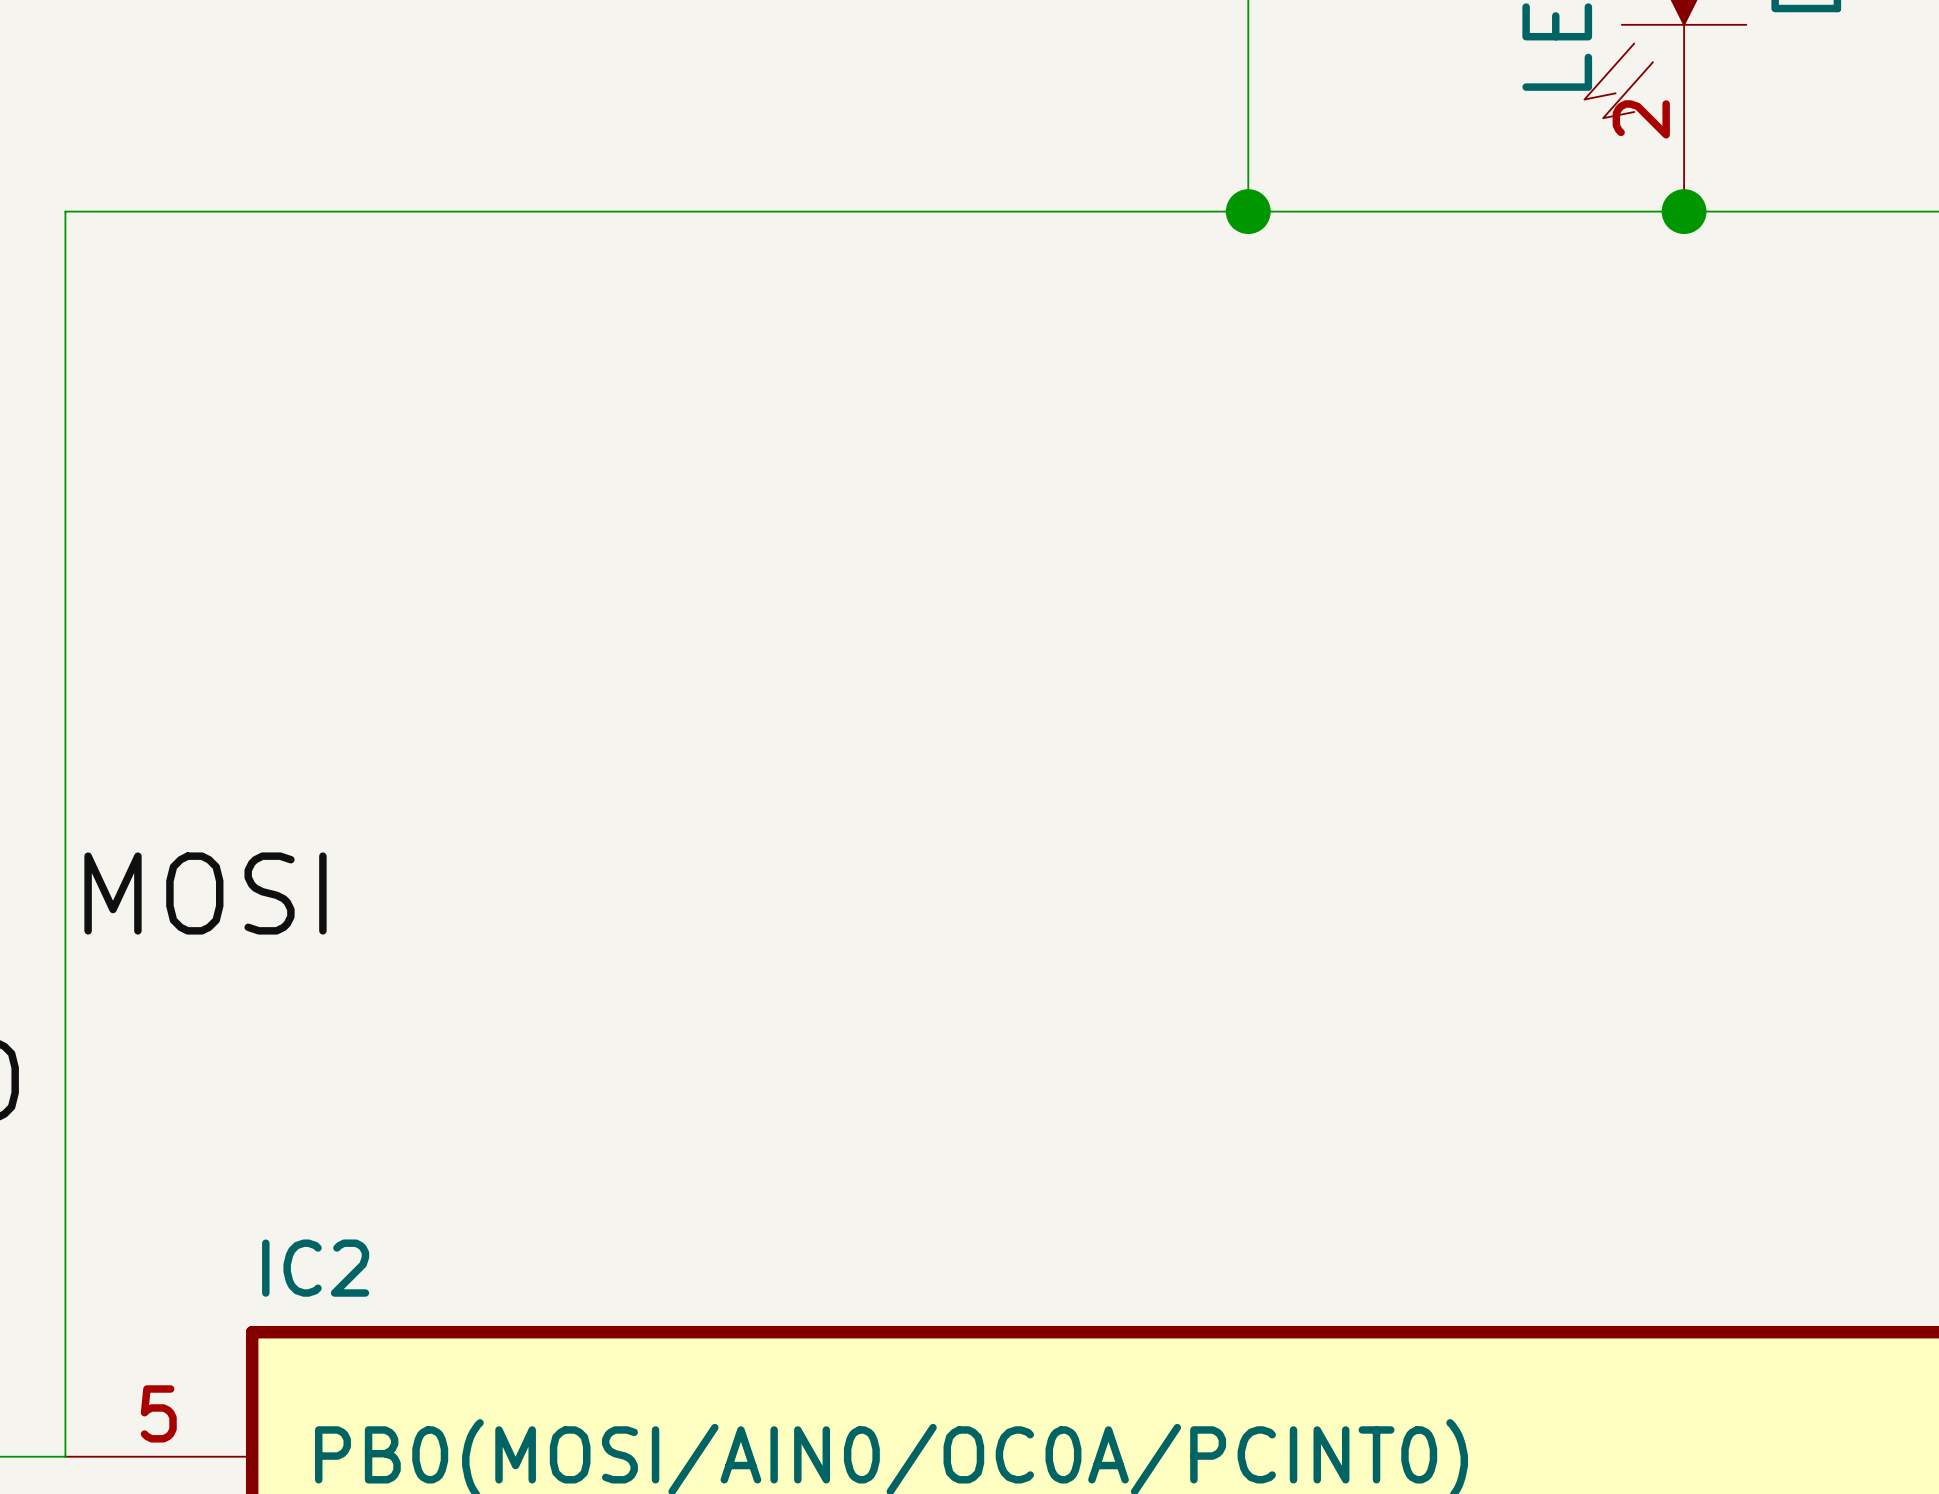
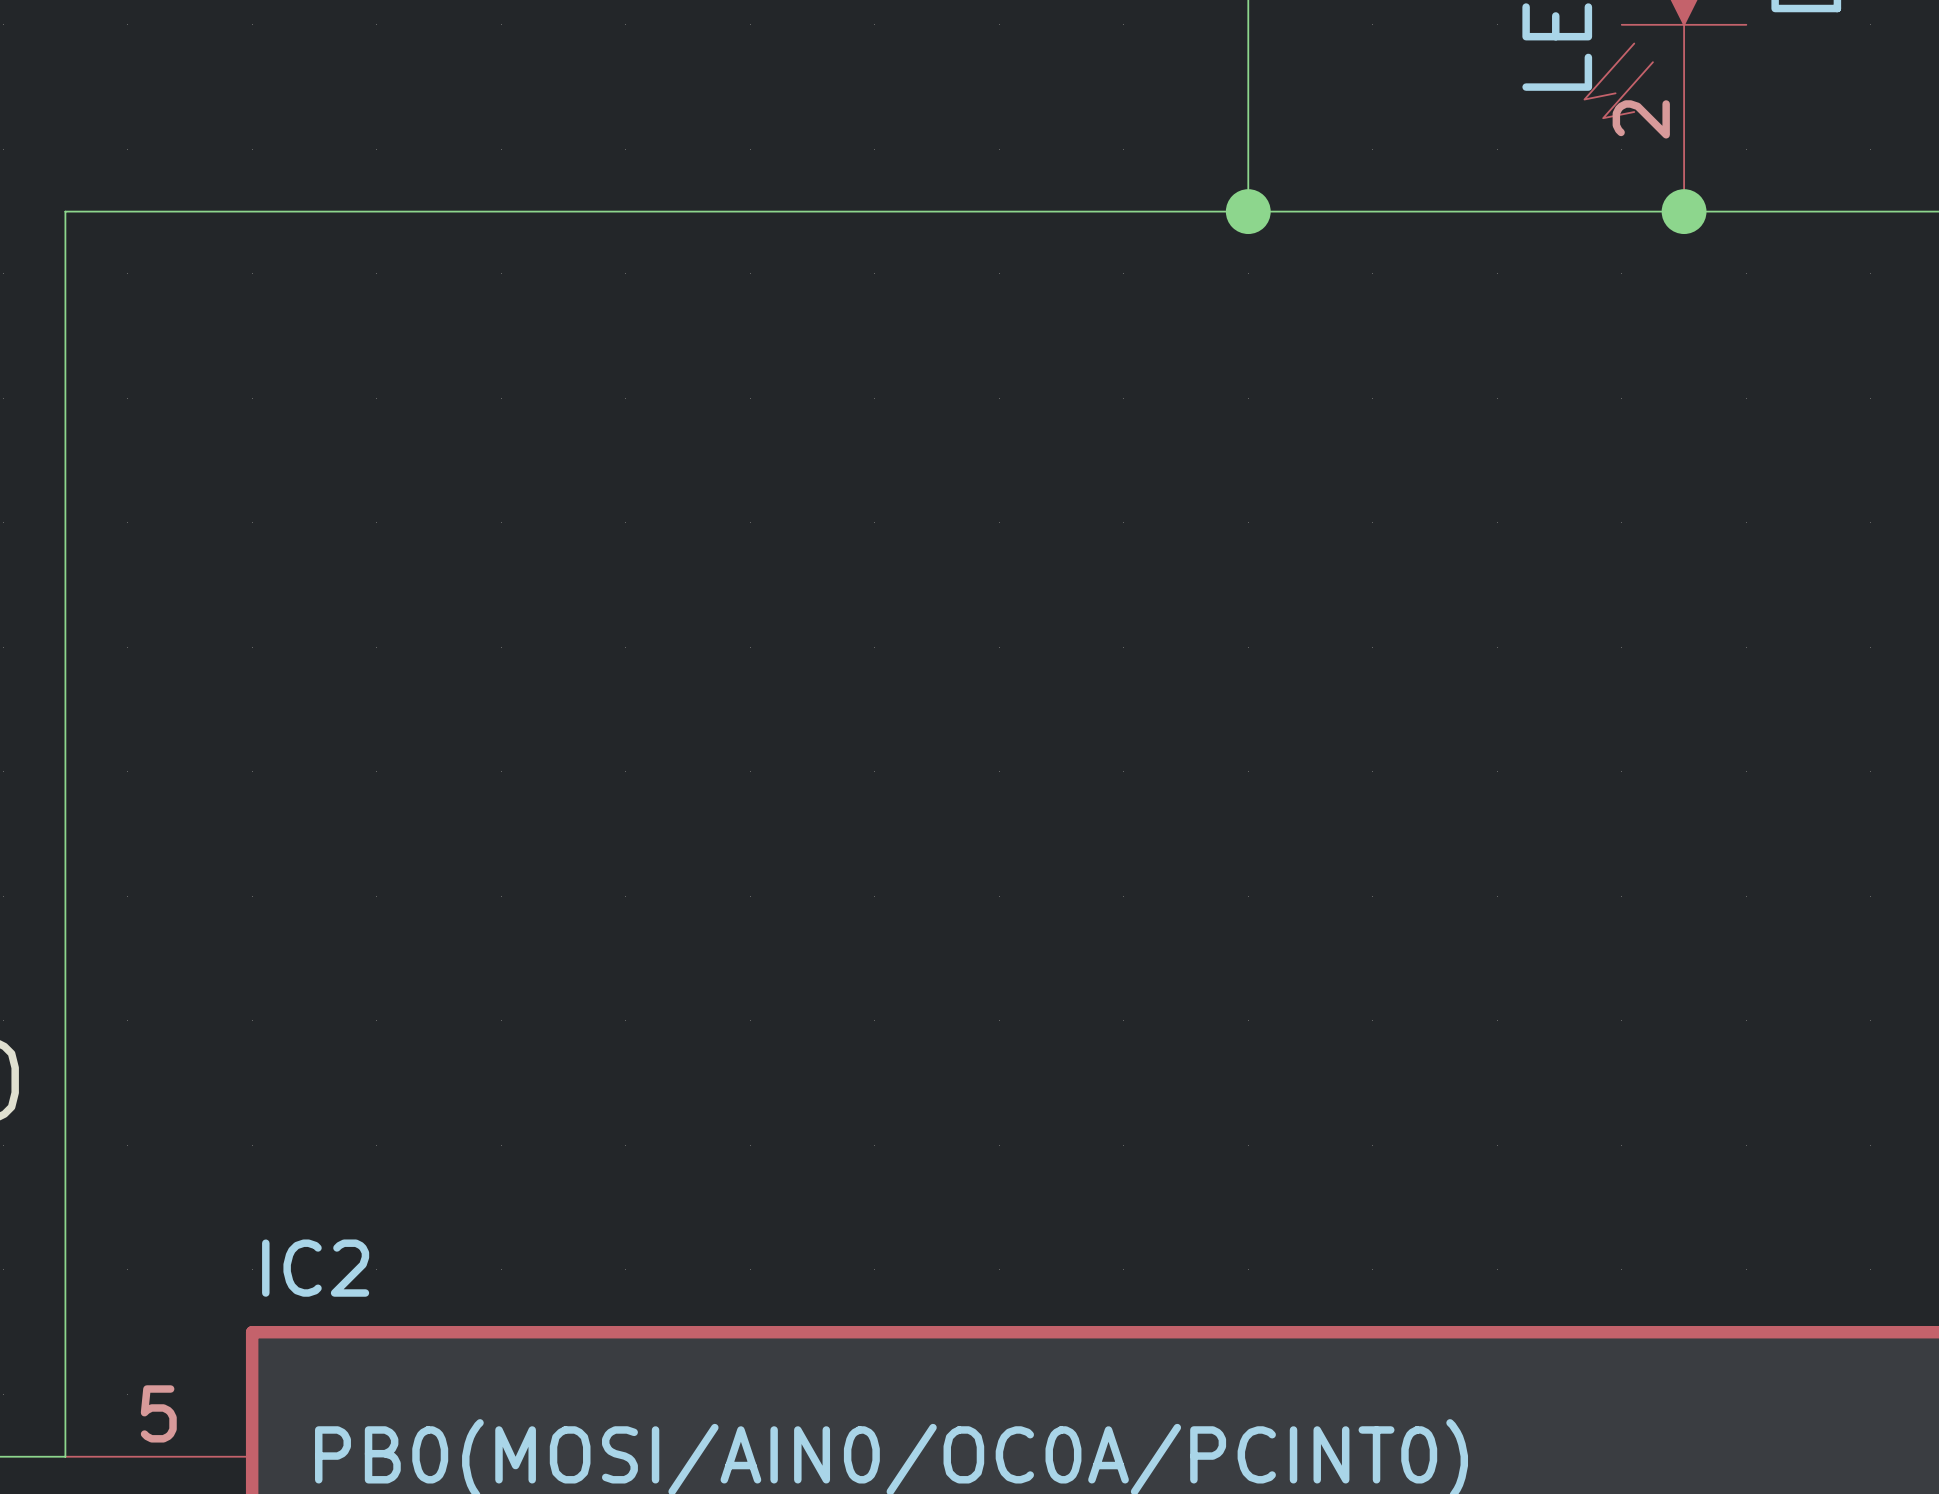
label: MOSI (205, 893) -> none

